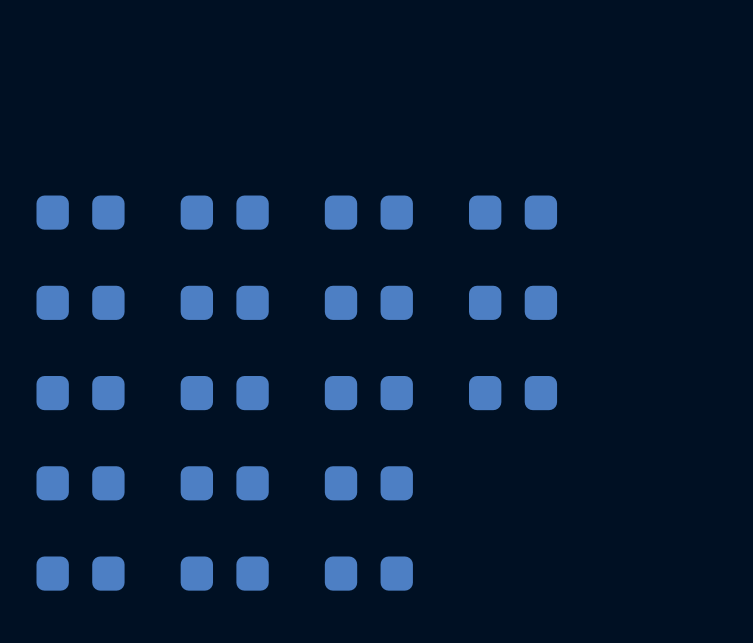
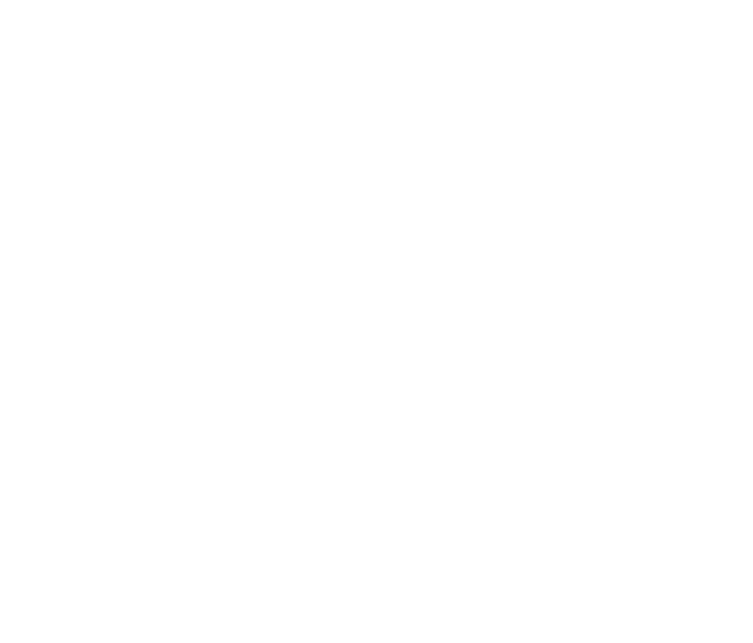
part: (80, 212) -> none
part: (224, 212) -> none
part: (368, 212) -> none
part: (513, 212) -> none
part: (80, 302) -> none
part: (224, 302) -> none
part: (368, 302) -> none
part: (513, 302) -> none
part: (80, 393) -> none
part: (224, 393) -> none
part: (368, 393) -> none
part: (513, 393) -> none
part: (80, 483) -> none
part: (224, 483) -> none
part: (368, 483) -> none
part: (80, 573) -> none
part: (224, 573) -> none
part: (368, 573) -> none

